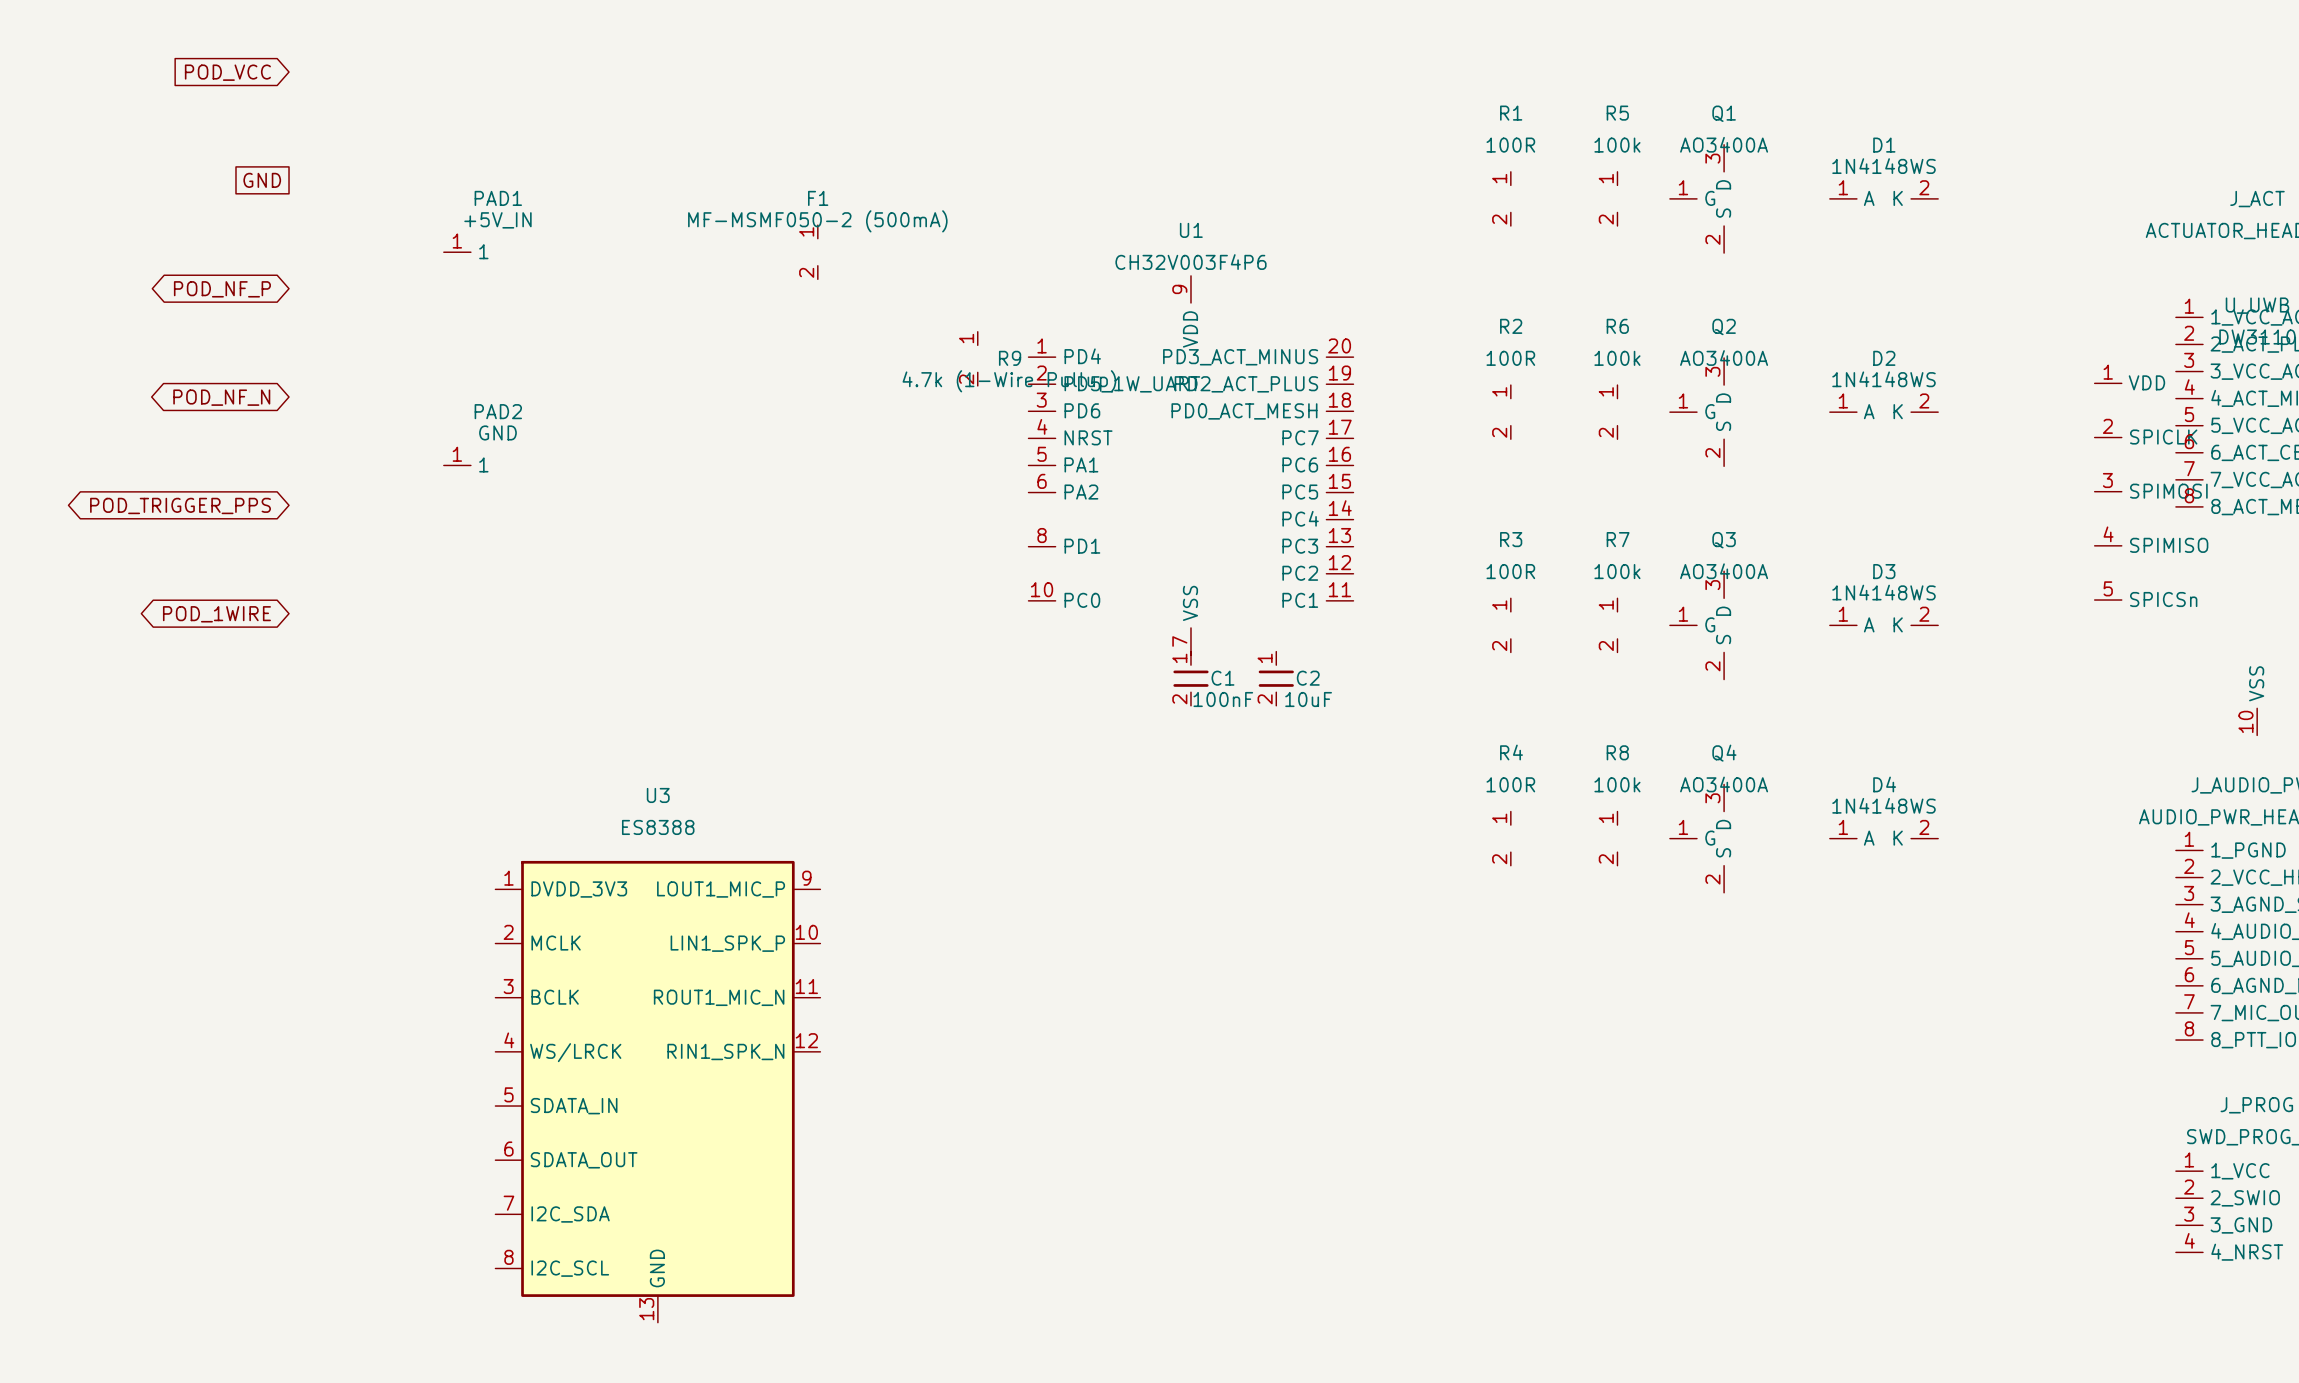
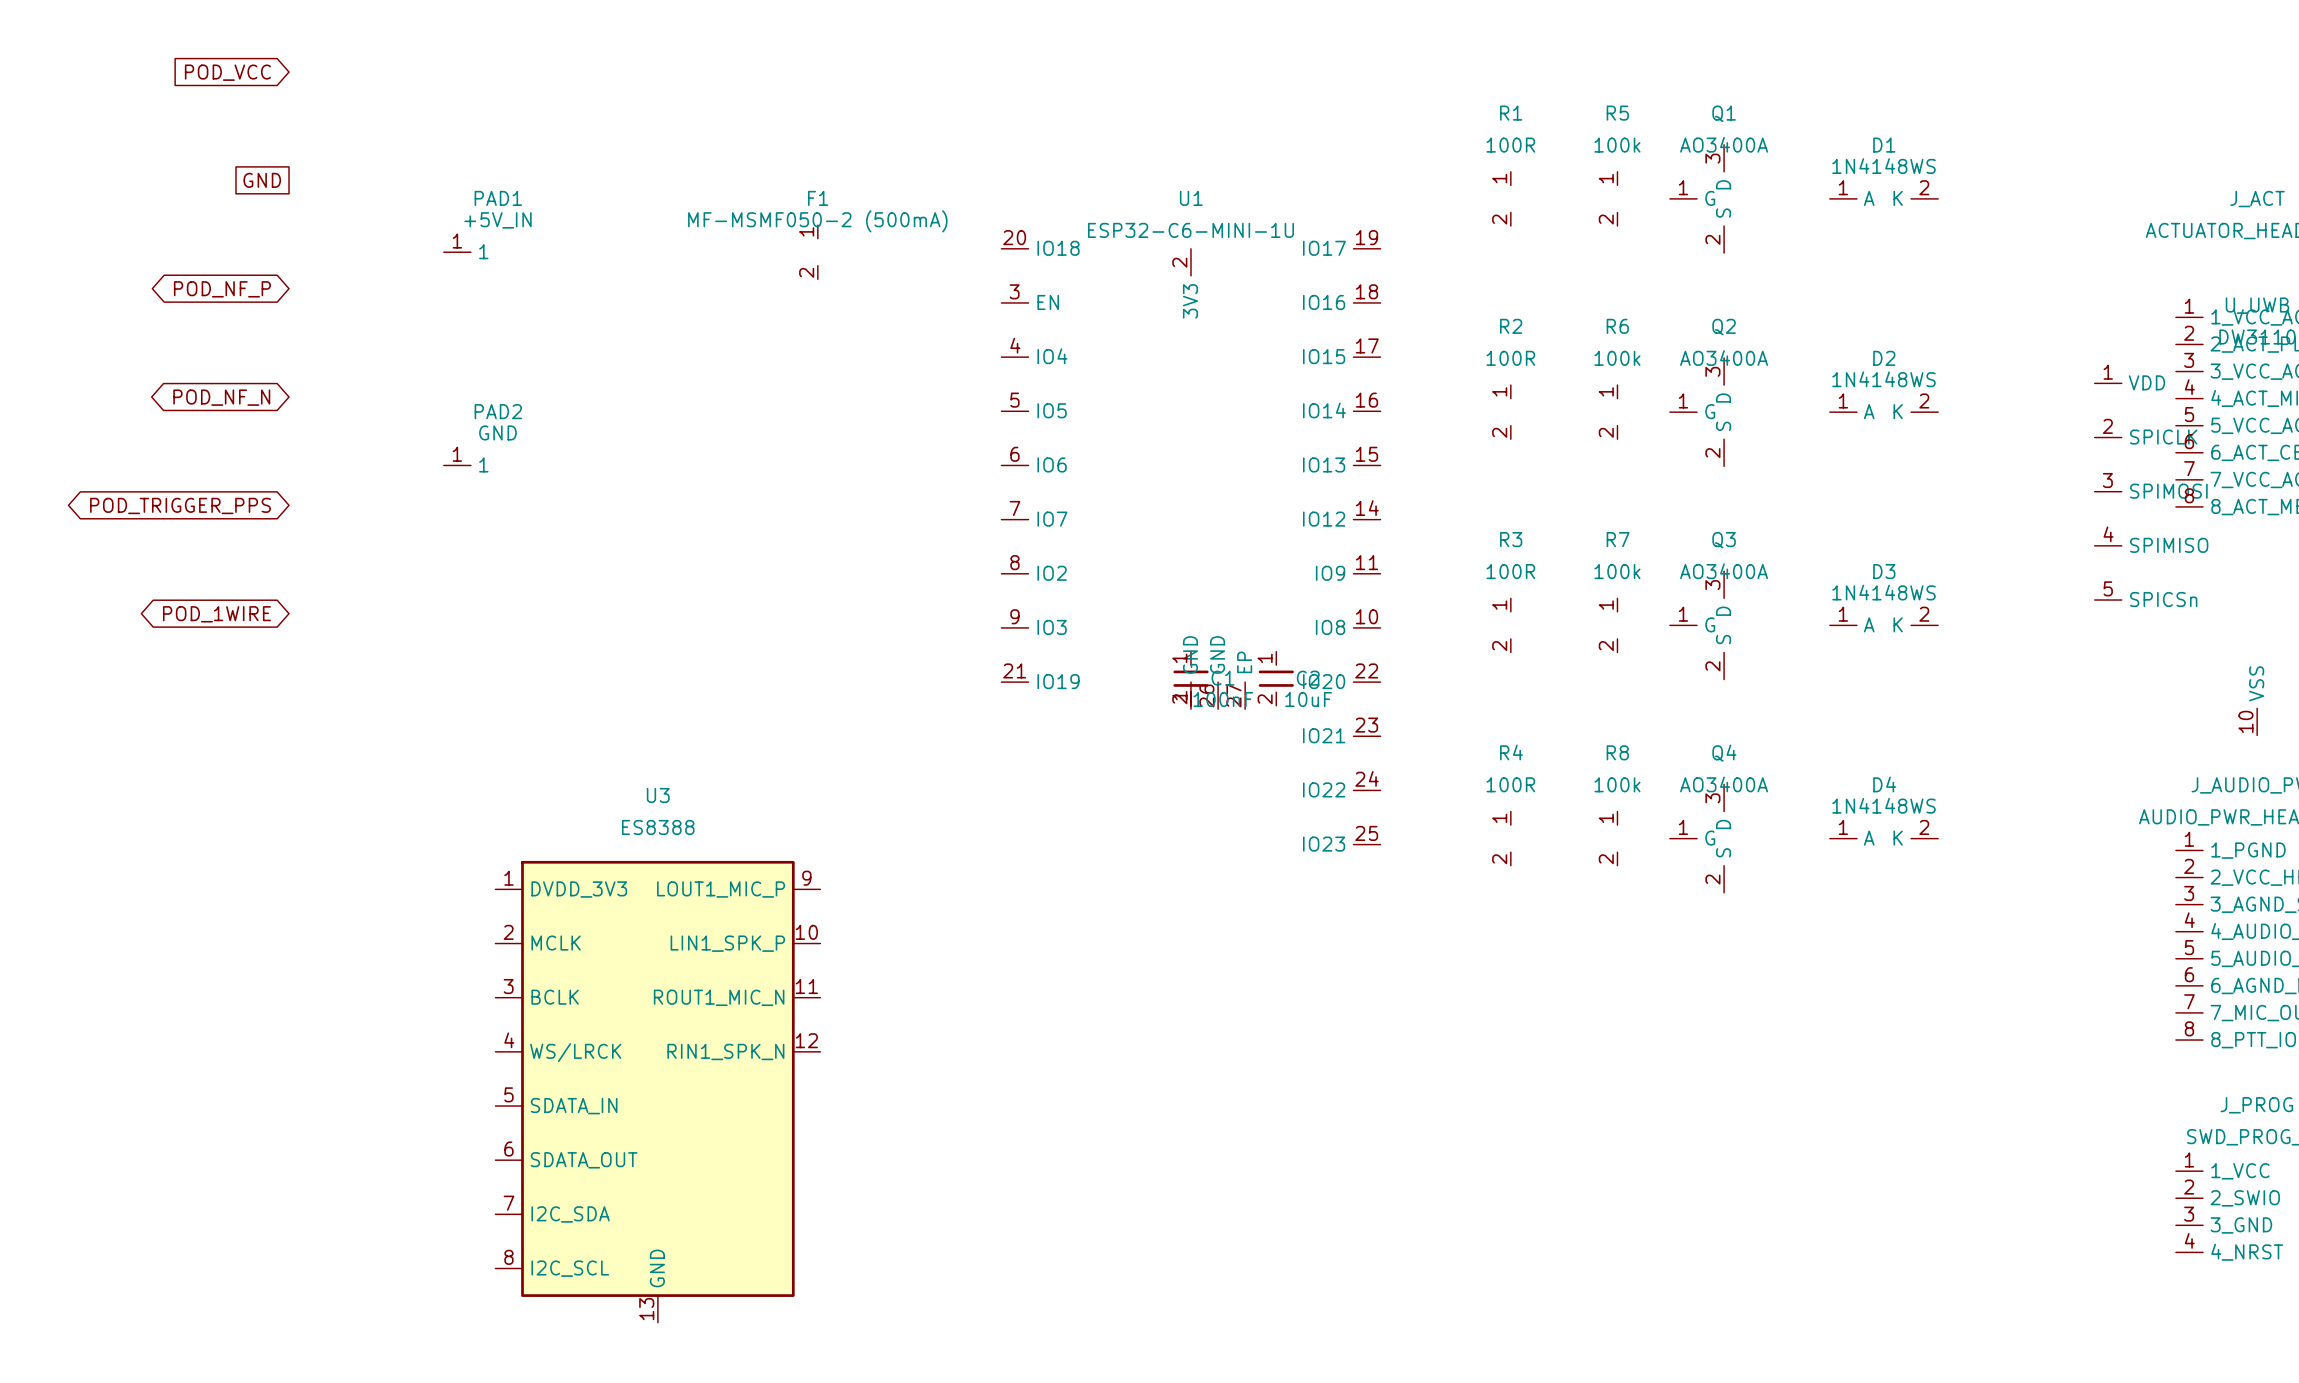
U1 name position: U1 (1191, 230) -> U1 (1191, 198)
U1 value: CH32V003F4P6 (1190, 262) -> ESP32-C6-MINI-1U (1190, 230)
U1 symbol: [1028, 275, 1354, 656] -> [1001, 248, 1381, 845]
R9: 4.7k (1-Wire Pullup) (977, 358) -> none

